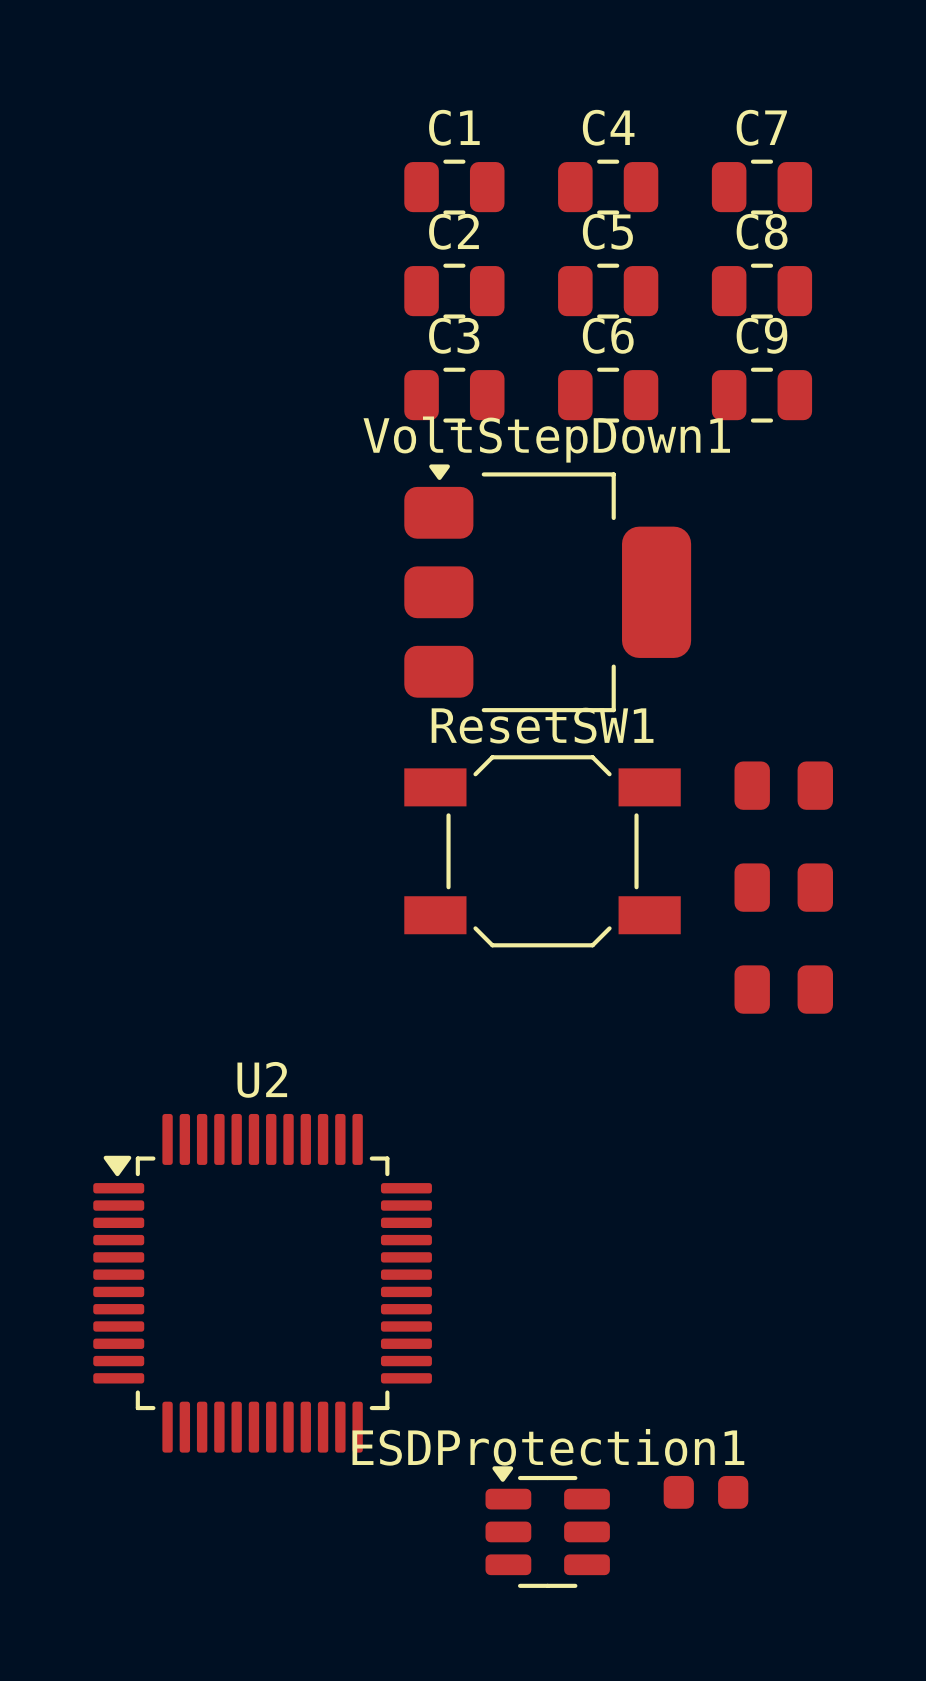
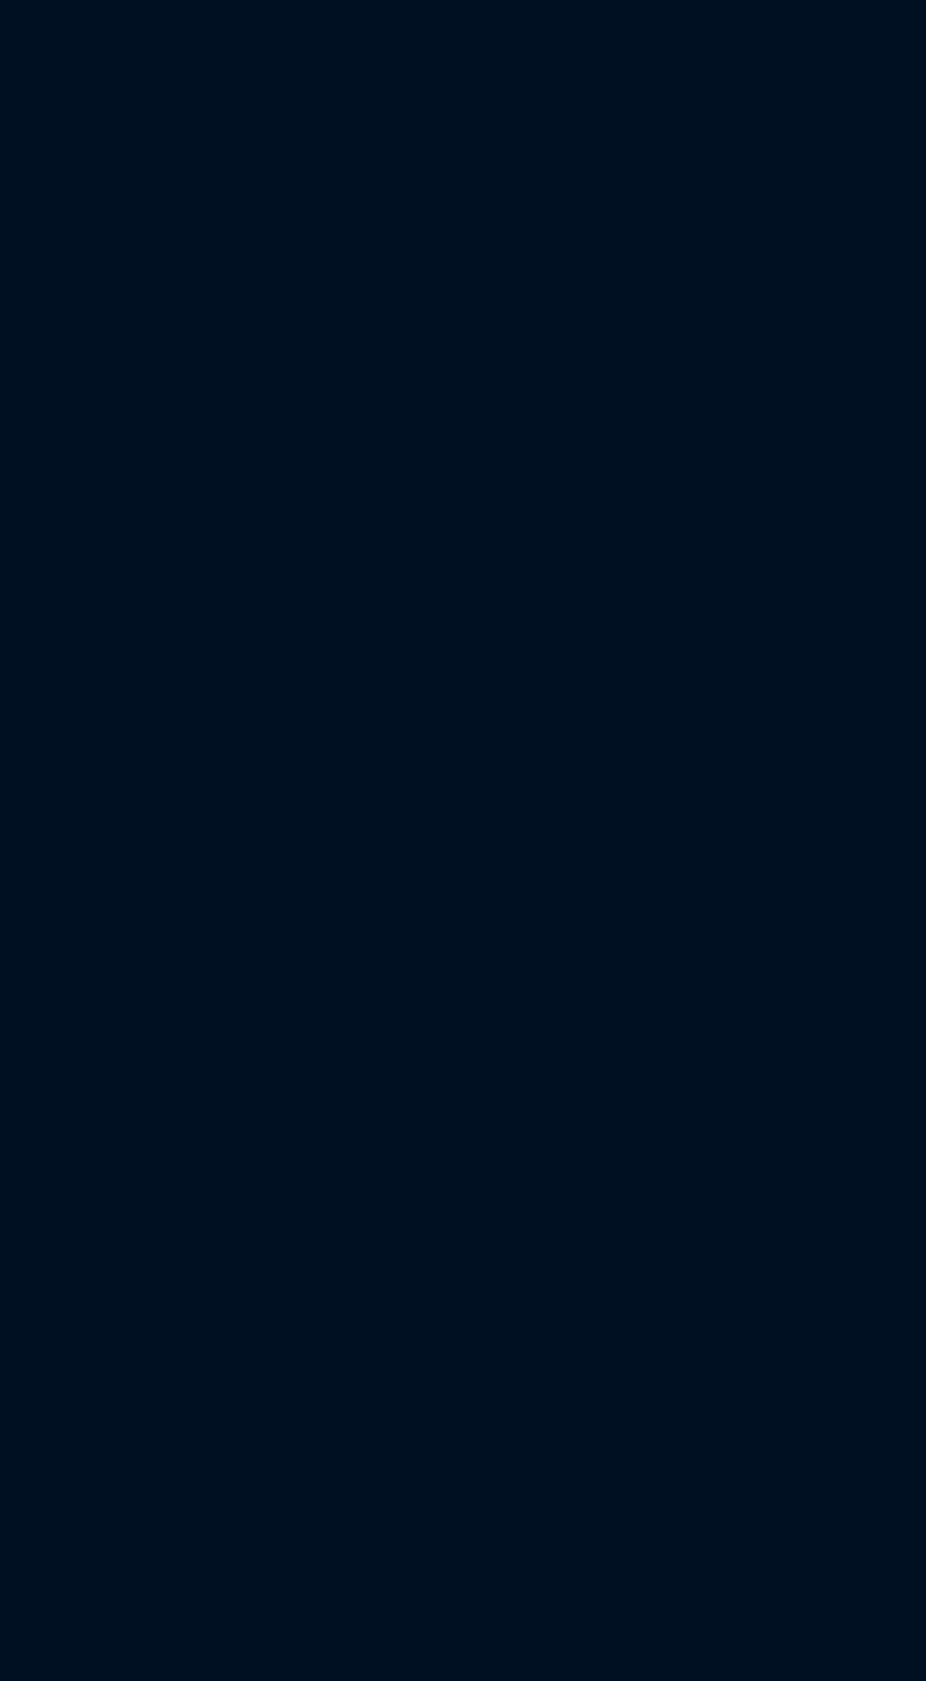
C1: (454, 187) -> none
C4: (608, 187) -> none
C7: (761, 187) -> none
C2: (454, 291) -> none
C5: (608, 291) -> none
C8: (761, 291) -> none
C3: (454, 395) -> none
C6: (608, 395) -> none
C9: (761, 395) -> none
VoltStepDown1: (547, 588) -> none
part: (783, 785) -> none
ResetSW1: (542, 851) -> none
part: (783, 887) -> none
part: (783, 989) -> none
U2: (262, 1283) -> none
part: (705, 1492) -> none
ESDProtection1: (547, 1527) -> none

